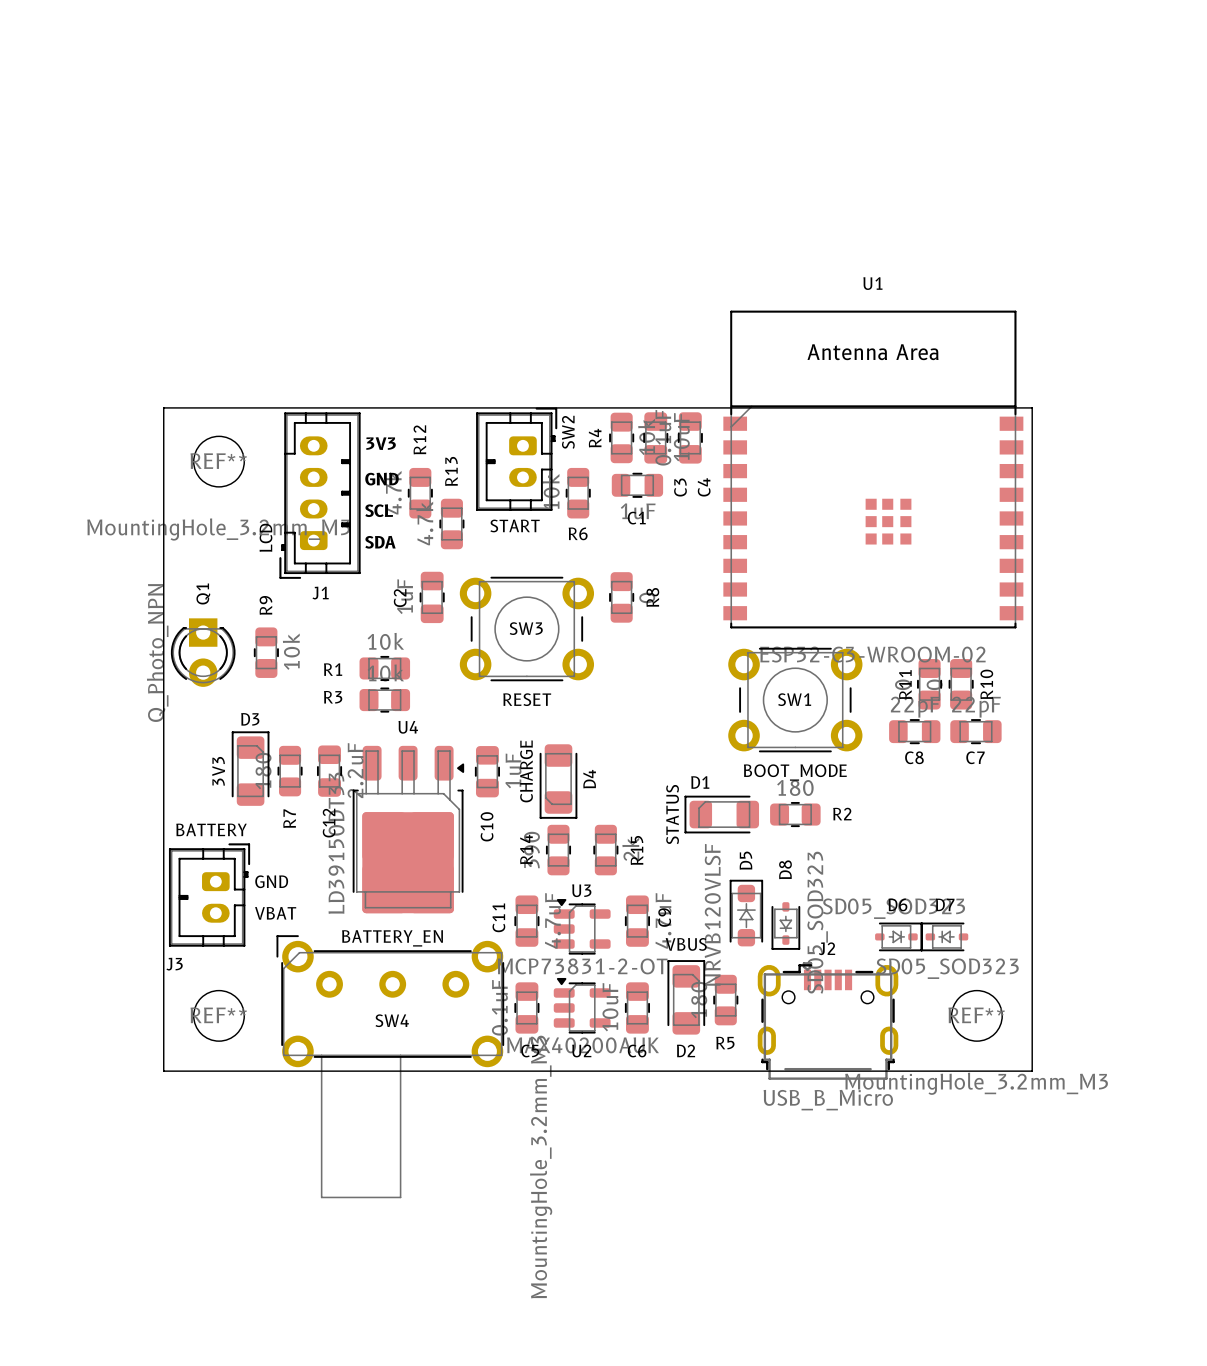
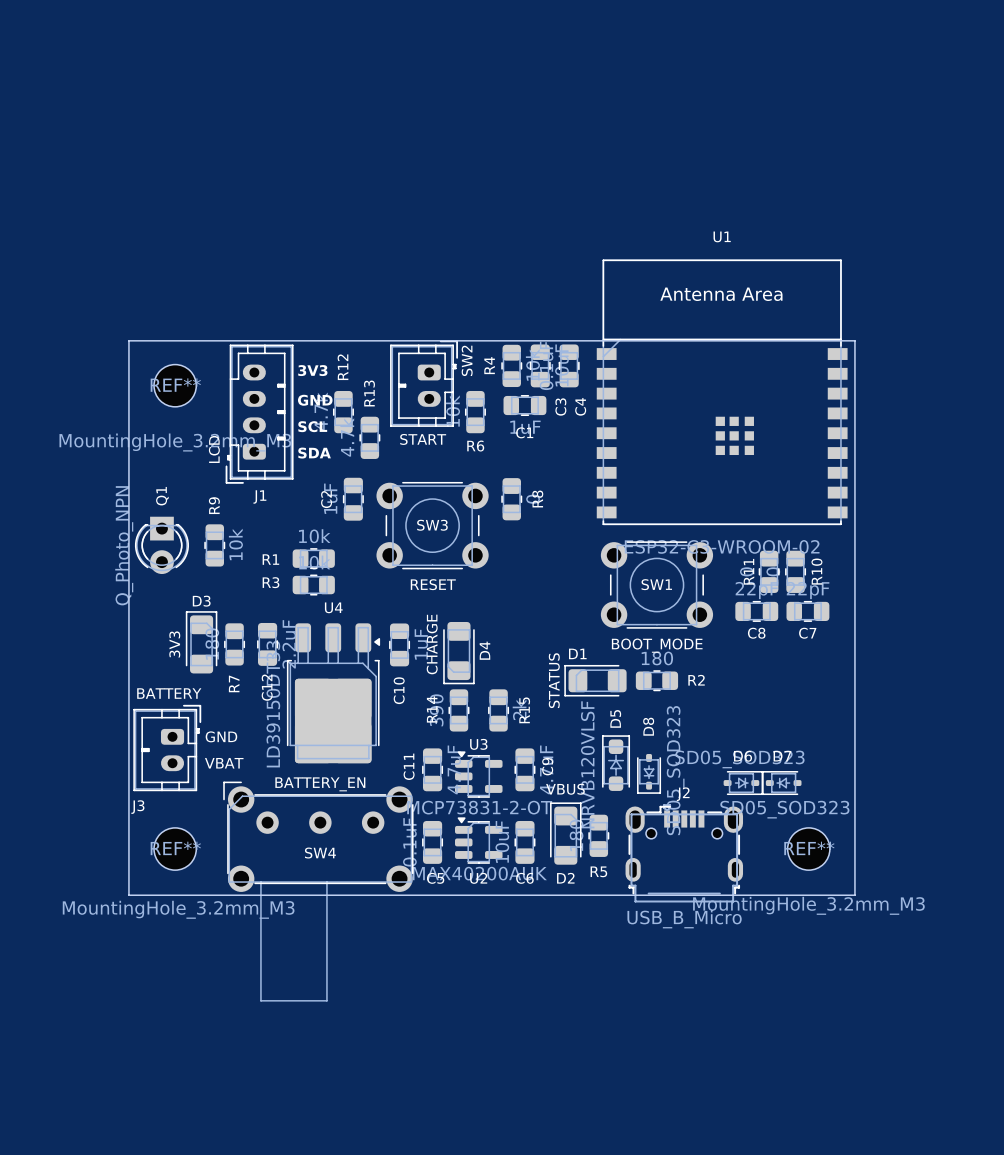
REF** value rotation: 0° (541, 1167) -> 90° clockwise (178, 909)

